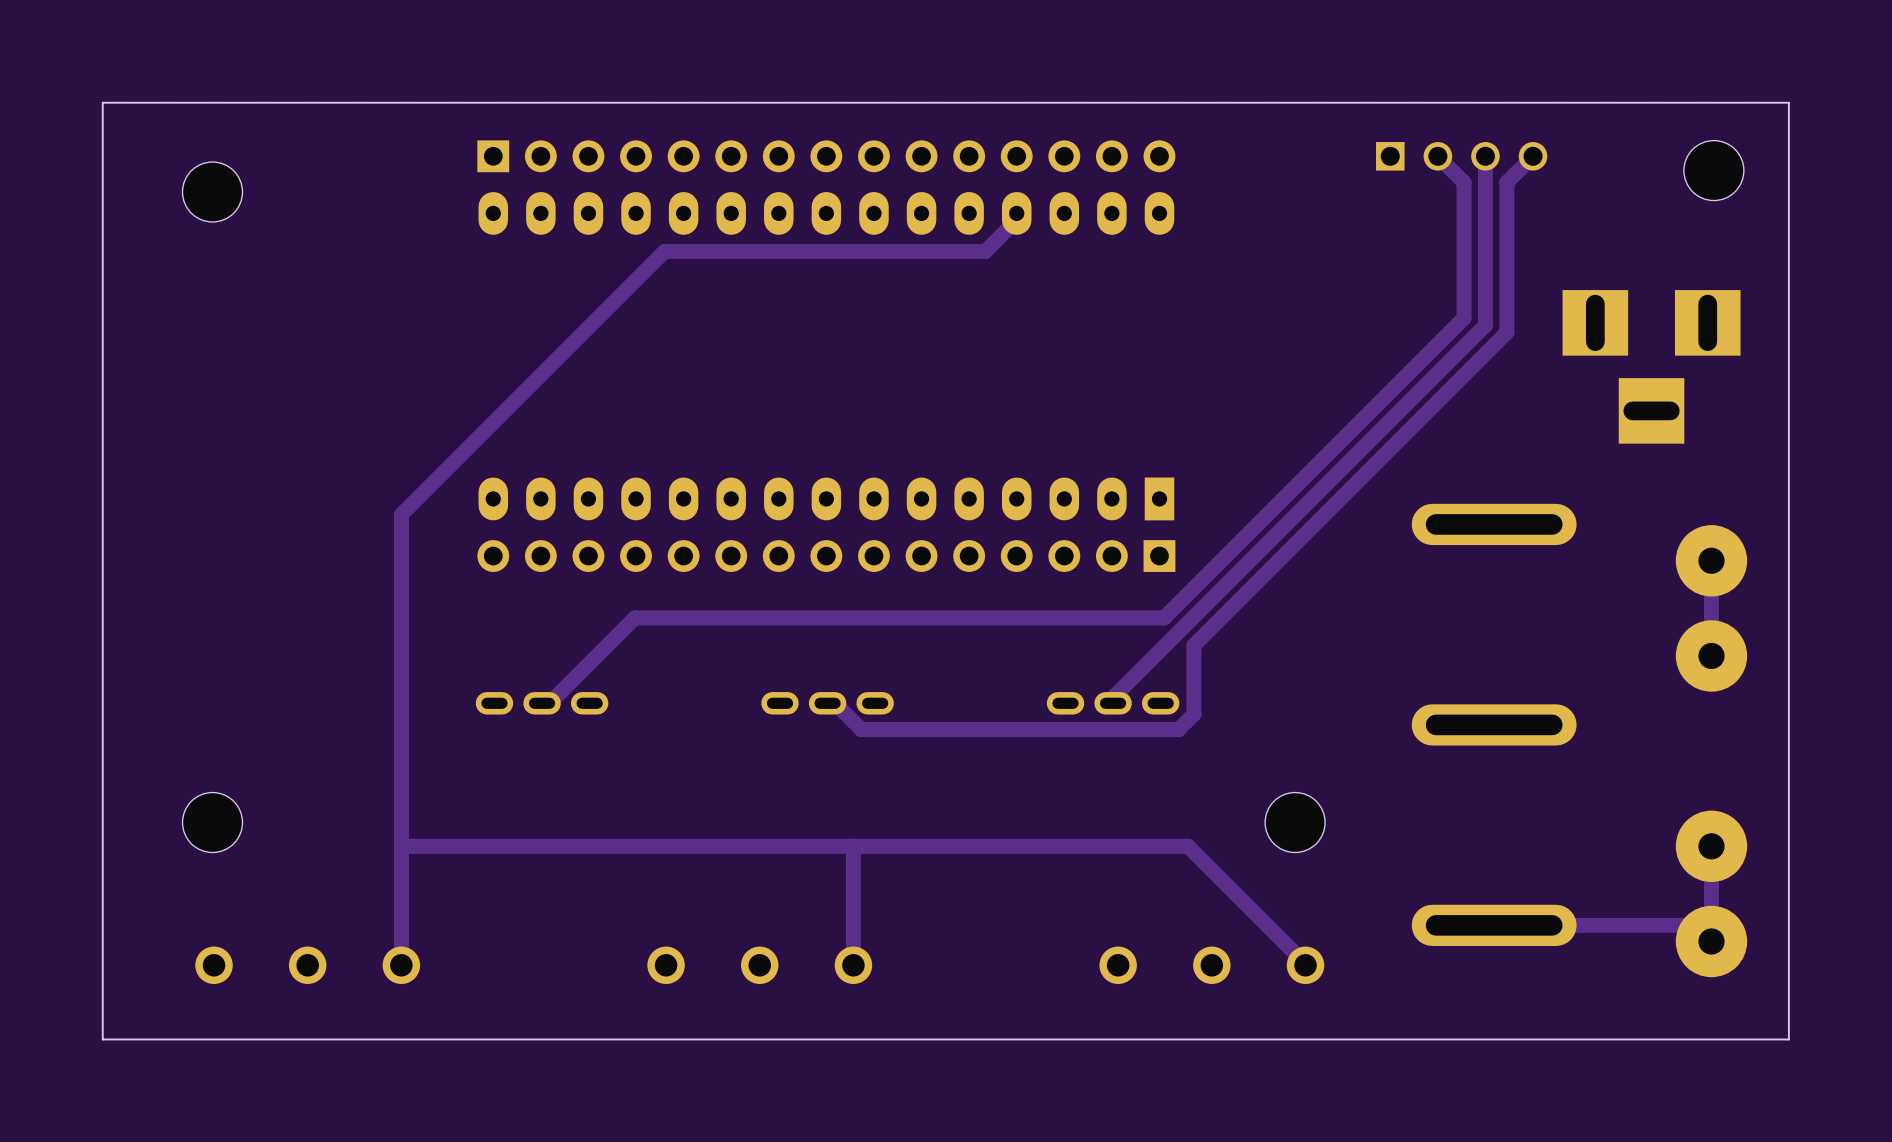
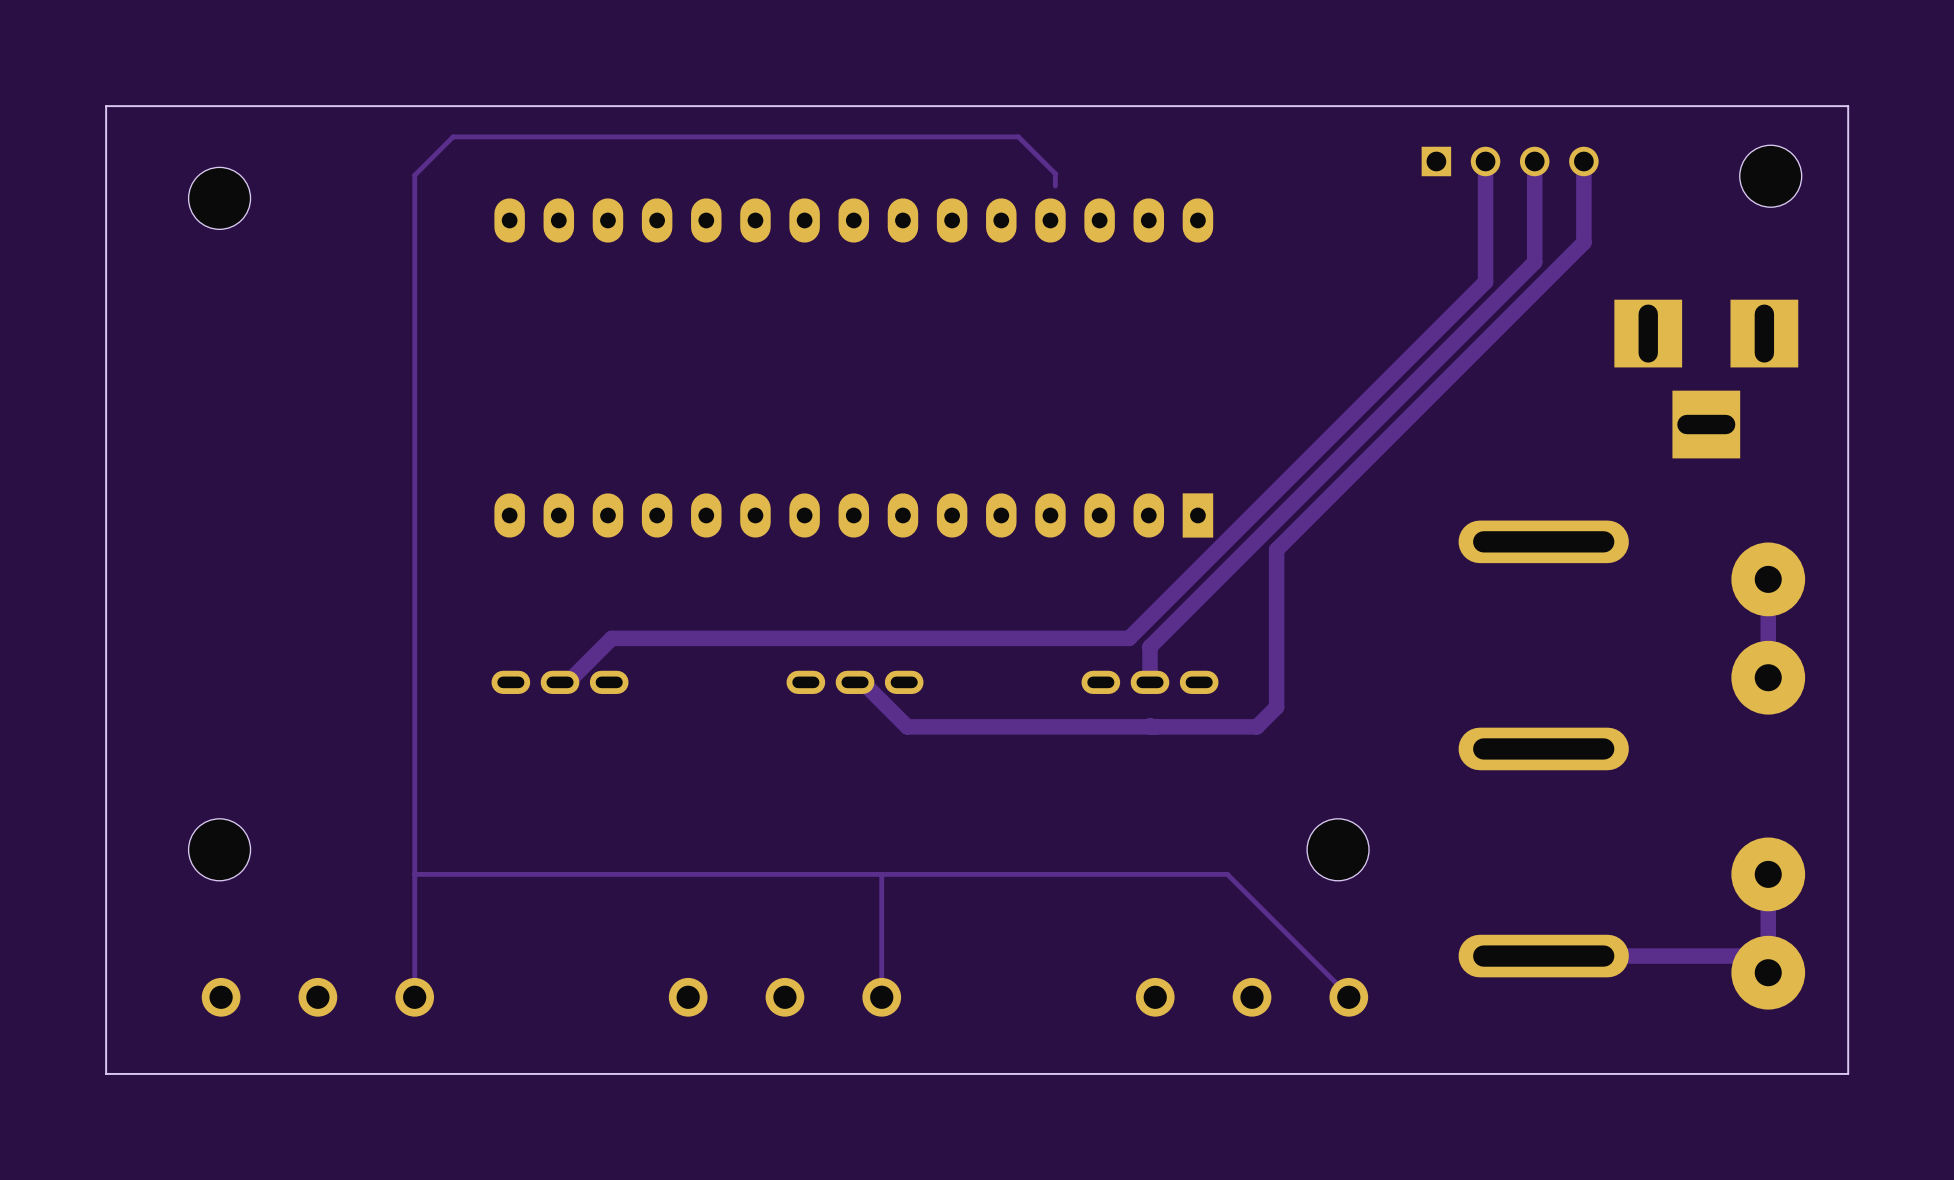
part: (826, 156) -> none
track: (1437, 156) (1464, 182) (1464, 318) (1164, 617) (1092, 617) -> (1485, 161) (1485, 281) (1129, 638)
track: (1533, 156) (1506, 182) (1506, 332) (1193, 645) (1193, 714) (1178, 729) (861, 729) (835, 703) (827, 702) -> (1583, 161) (1583, 242) (1276, 549) (1276, 707) (1256, 726) (907, 726) (862, 682) (855, 681)
track: (1016, 213) (1016, 220) (985, 251) (664, 251) (401, 514) -> (1055, 186) (1055, 173) (1018, 136) (453, 136) (414, 175) (414, 531)
track: (1485, 253) (1485, 325) (1114, 696) (1114, 701) -> (1534, 262) (1150, 646) (1150, 682)
track width: thick (401, 514) (401, 965) -> thin (414, 531) (414, 997)
part: (826, 556) -> none
track: (634, 617) (549, 703) (542, 702) -> (656, 638) (611, 638) (567, 682) (560, 681)
part position: (542, 703) -> (560, 682)
part position: (827, 703) -> (855, 682)
part position: (1113, 703) -> (1150, 682)
track width: thick (401, 846) (1188, 846) (1305, 965) -> thin (414, 874) (1227, 874) (1348, 997)
track width: thick (853, 846) (853, 965) -> thin (881, 874) (881, 997)

